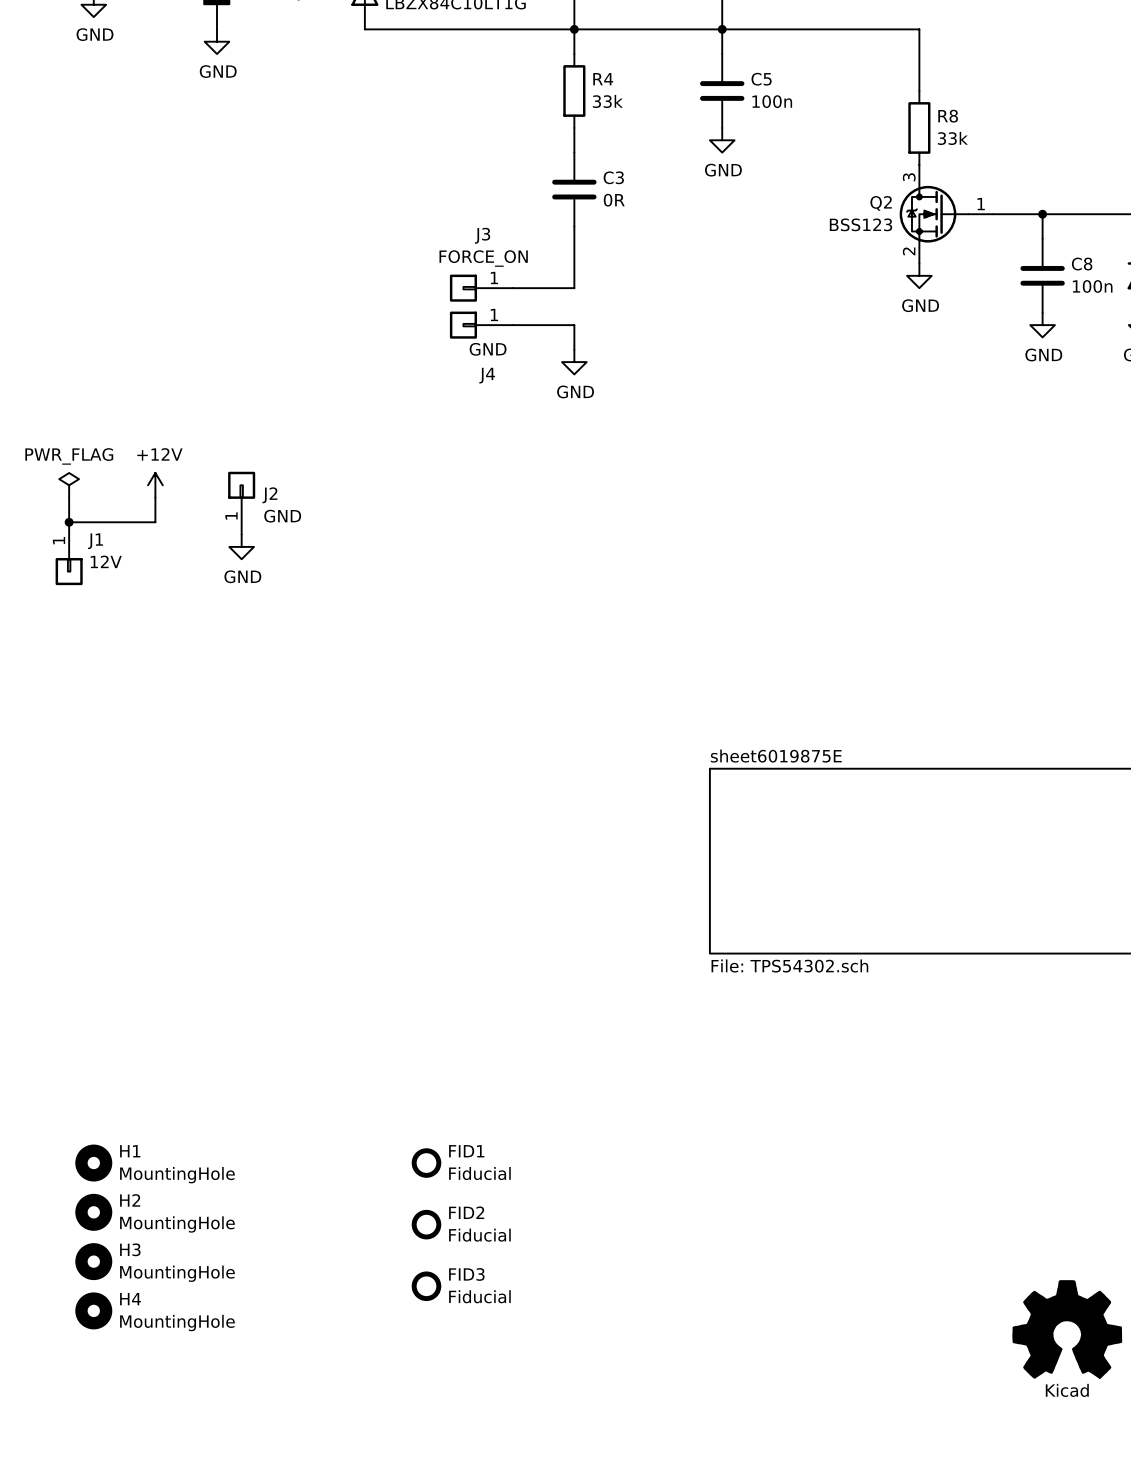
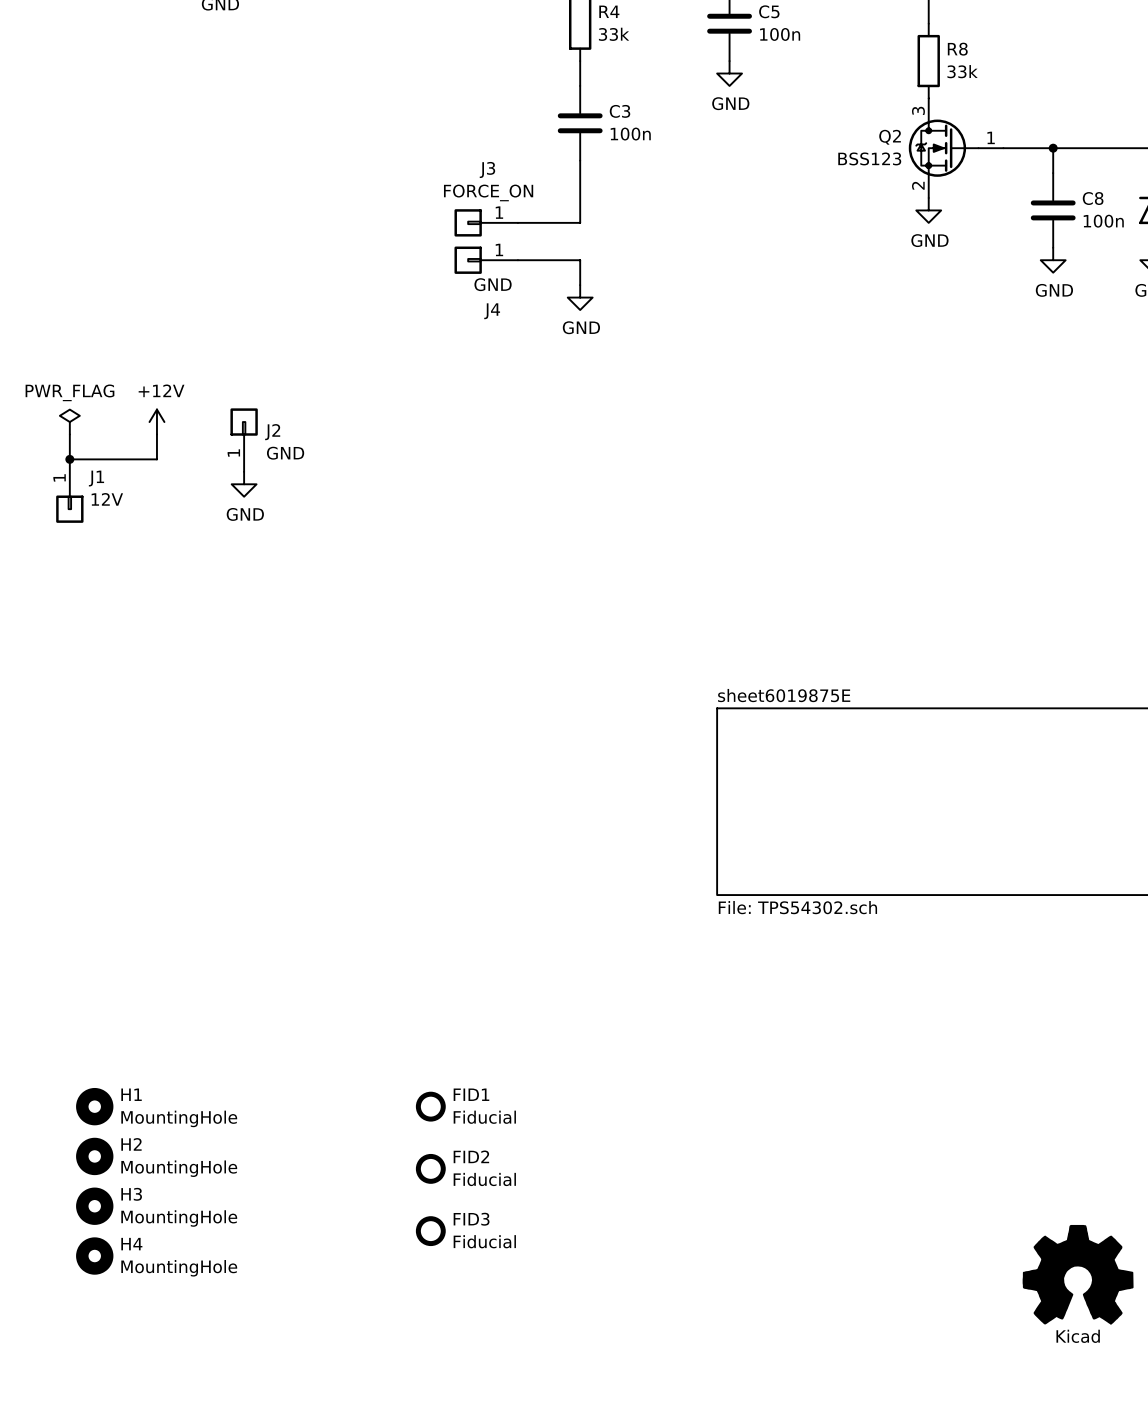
C3 value: 0R (614, 200) -> 100n (630, 134)

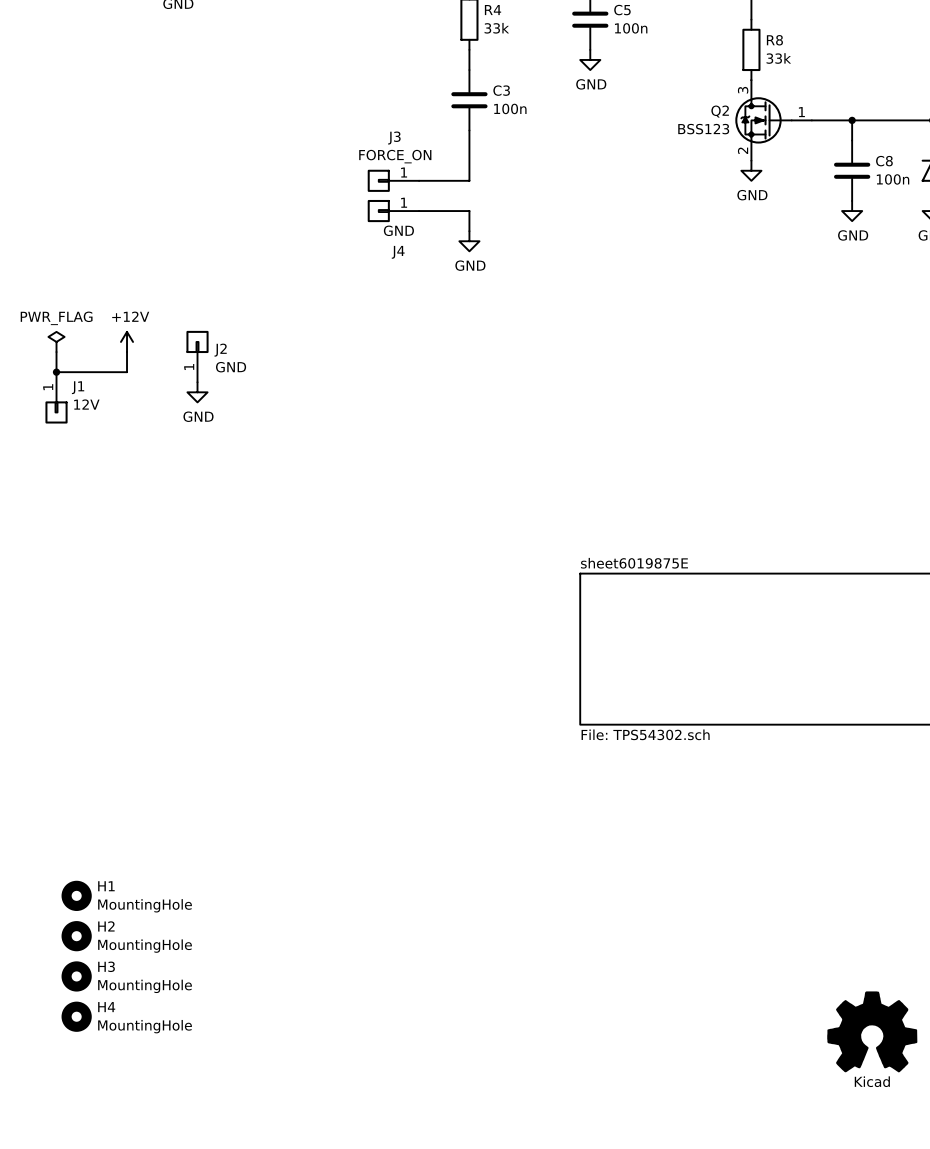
FID1: Fiducial (430, 1106) -> none
FID2: Fiducial (430, 1168) -> none
FID3: Fiducial (430, 1231) -> none

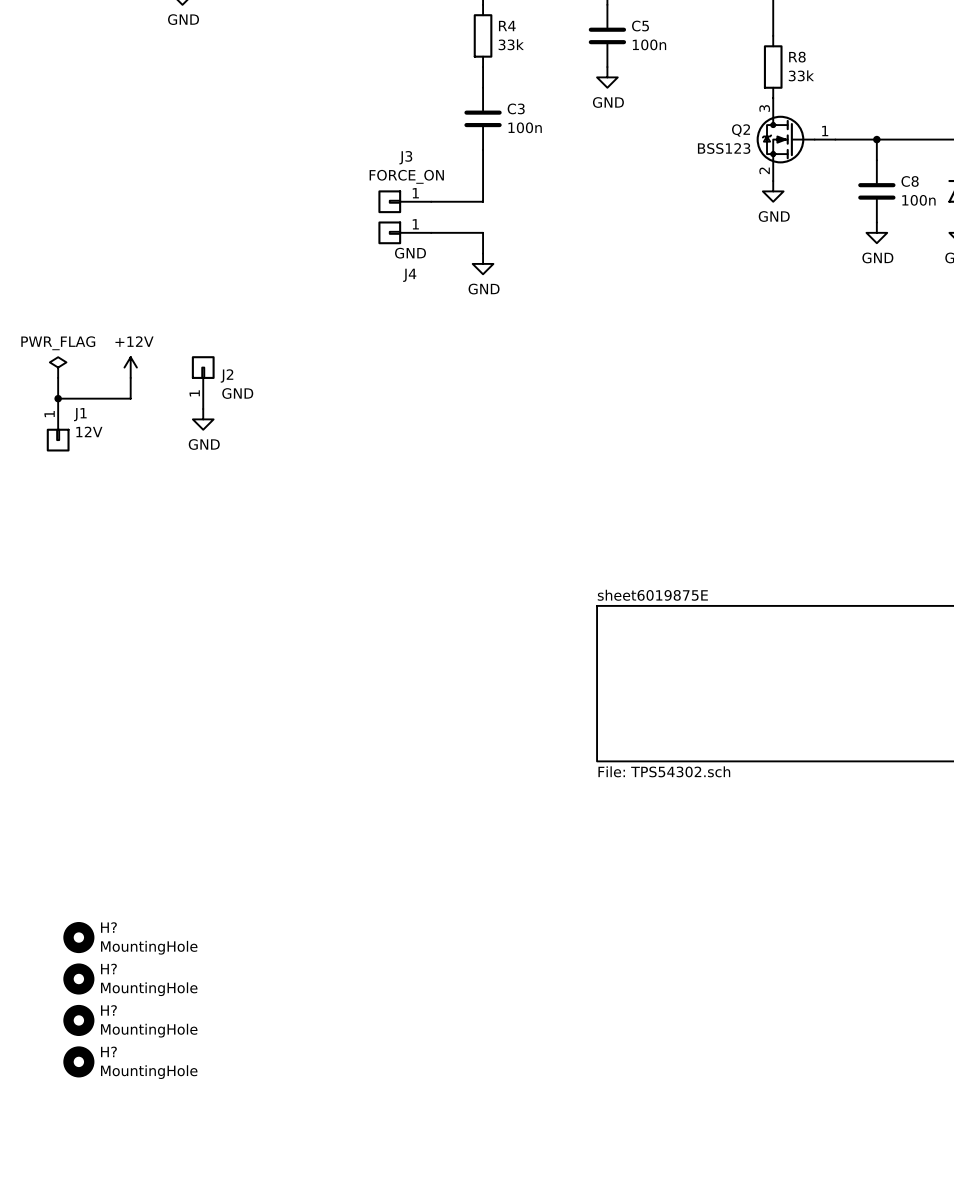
H1 name: H1 (106, 886) -> H? (108, 927)
H2 name: H2 (106, 926) -> H? (108, 968)
H3 name: H3 (106, 966) -> H? (108, 1010)
H4 name: H4 (106, 1007) -> H? (108, 1051)
power symbol: Kicad (872, 1031) -> none

